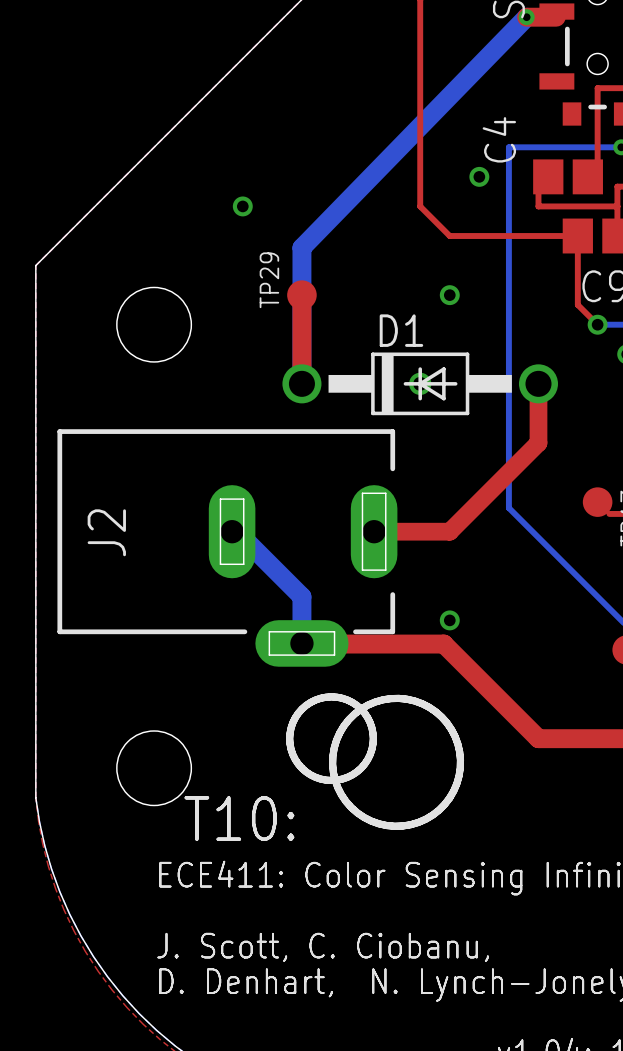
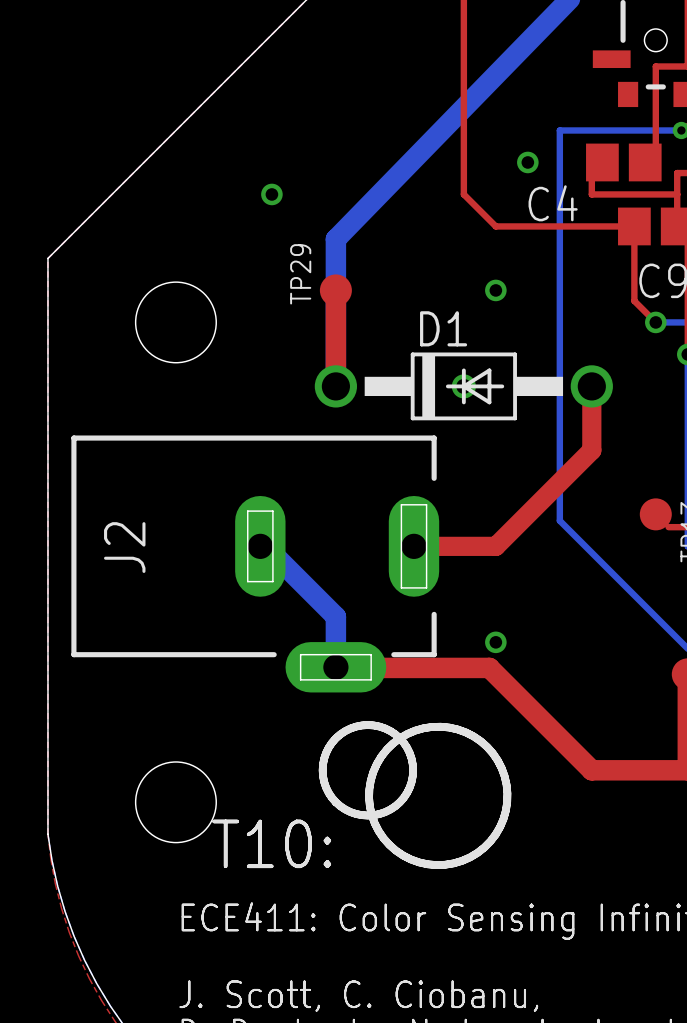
C4 name rotation: 0° (499, 139) -> 90° clockwise (553, 203)
C4 name position: C4 (499, 139) -> C4 (553, 203)
text position: T10: (239, 818) -> T10: (271, 843)

